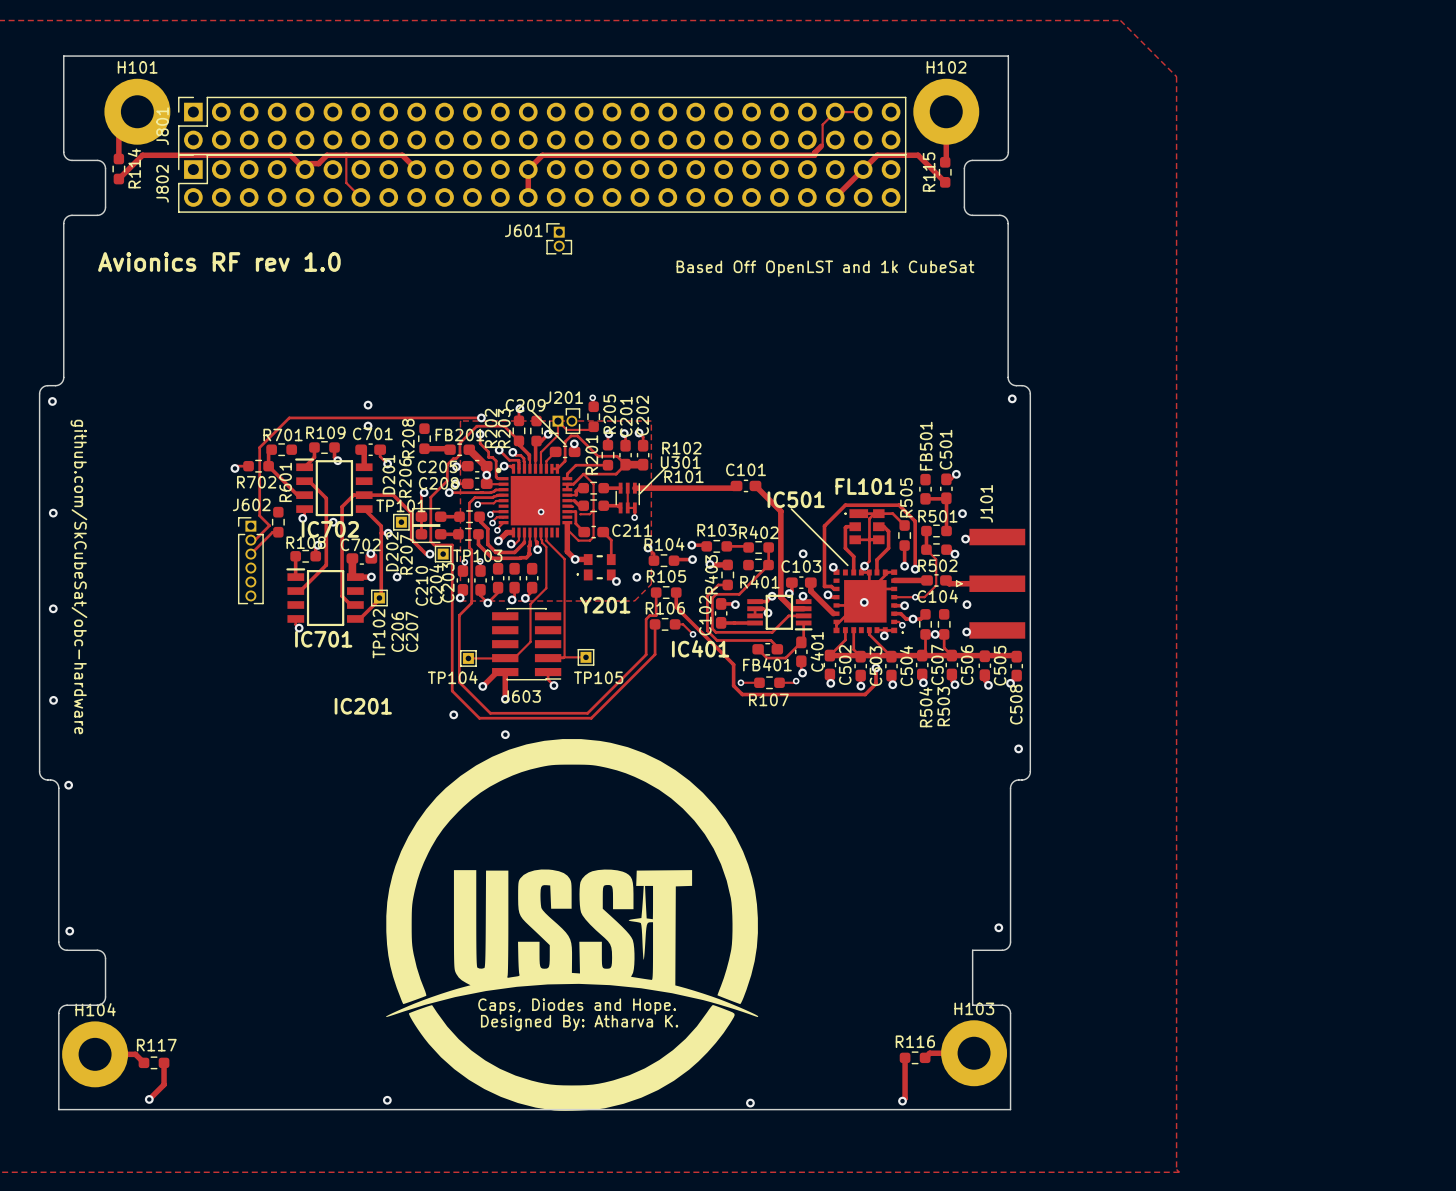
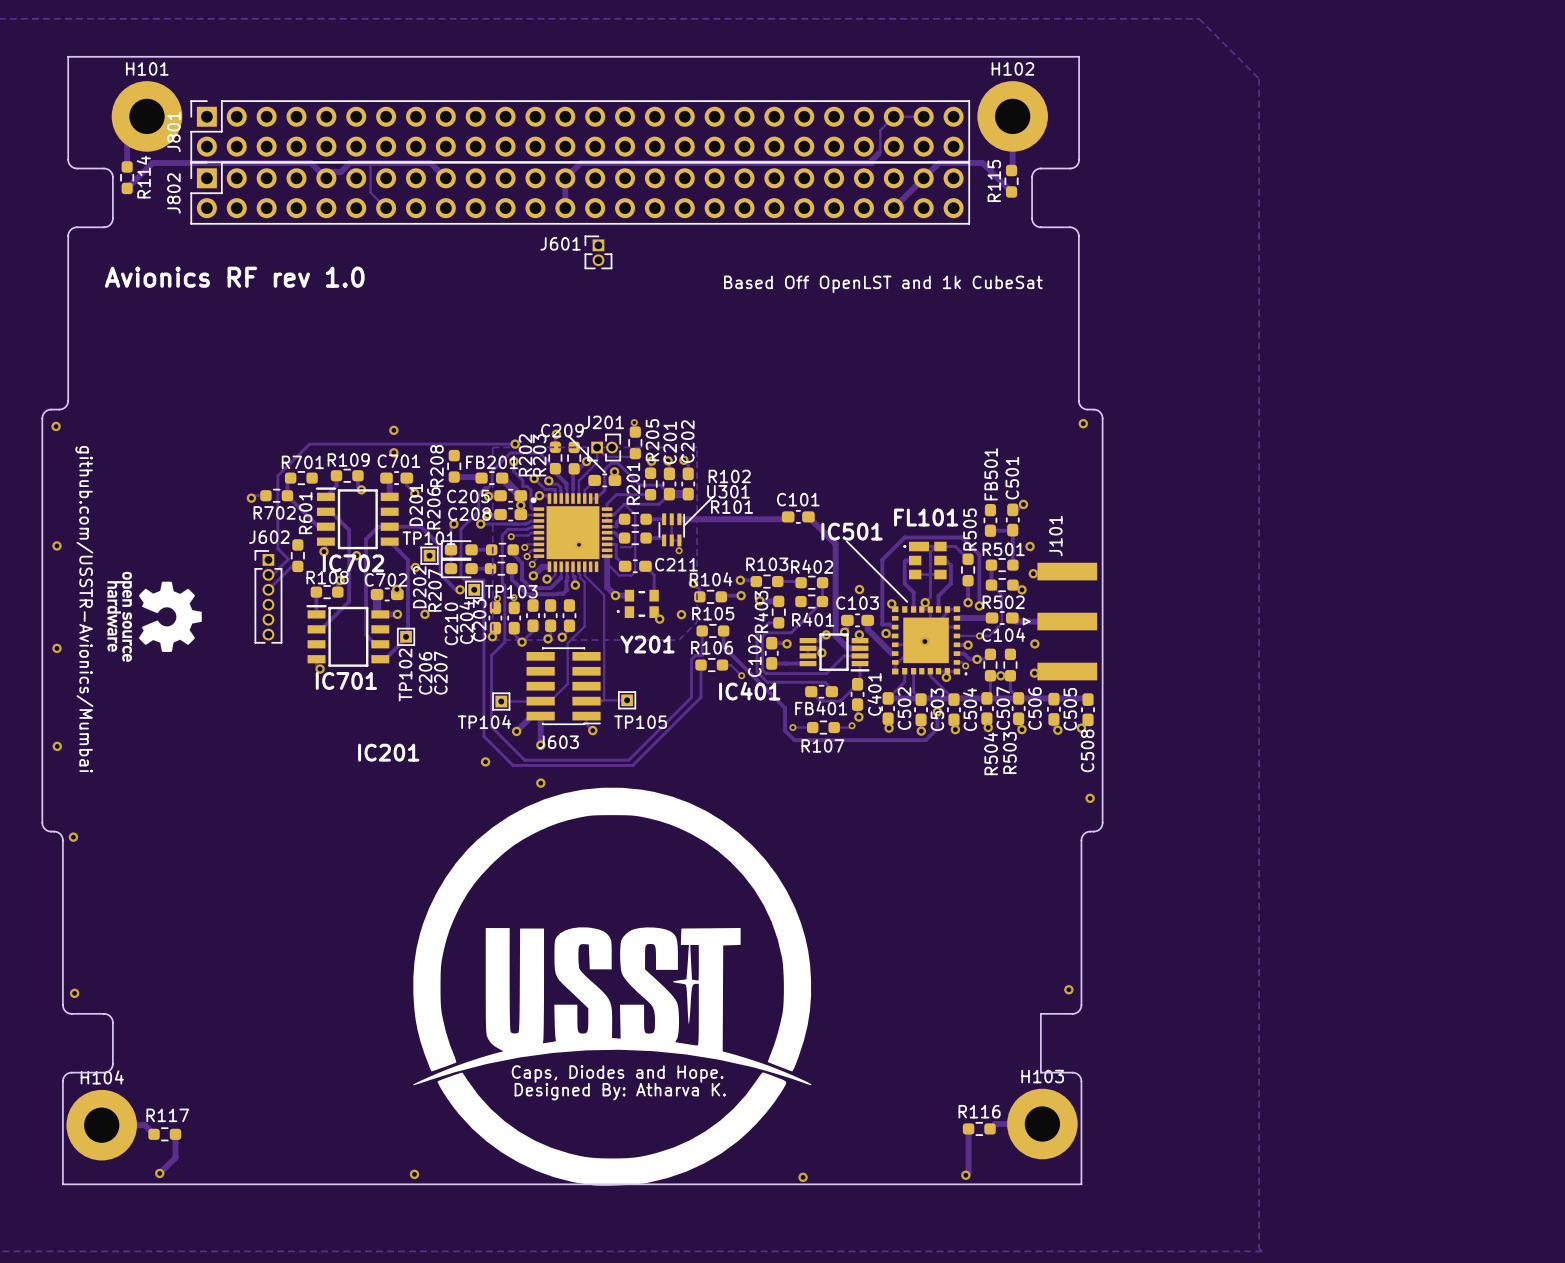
drawing: none -> [107, 571, 202, 662]
text: github.com/SkCubeSat/obc-hardware (78, 576) -> github.com/USSTR-Avionics/Mumbai (84, 609)

